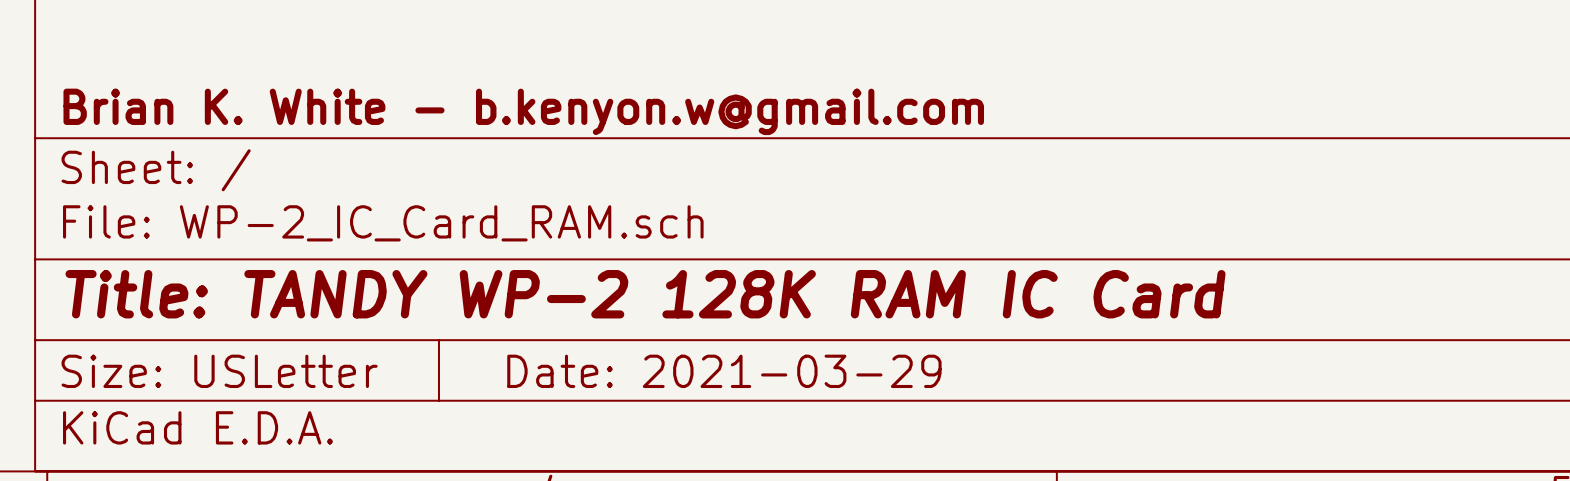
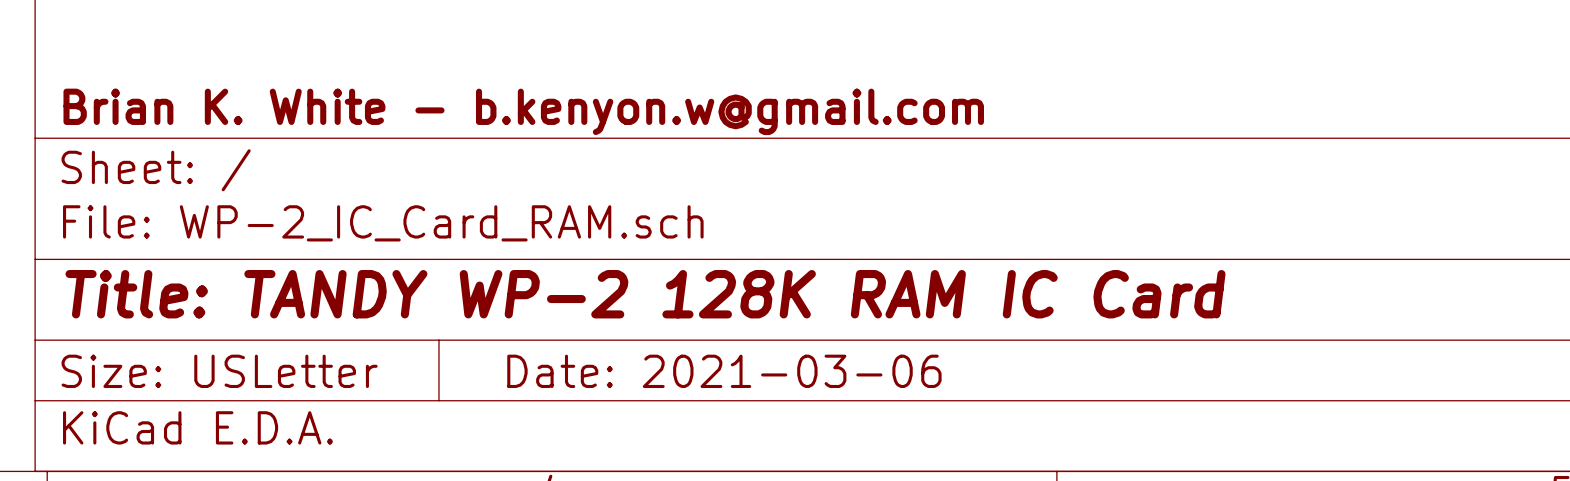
title block: Date: 2021-03-29 (724, 371) -> Date: 2021-03-06 (724, 371)

